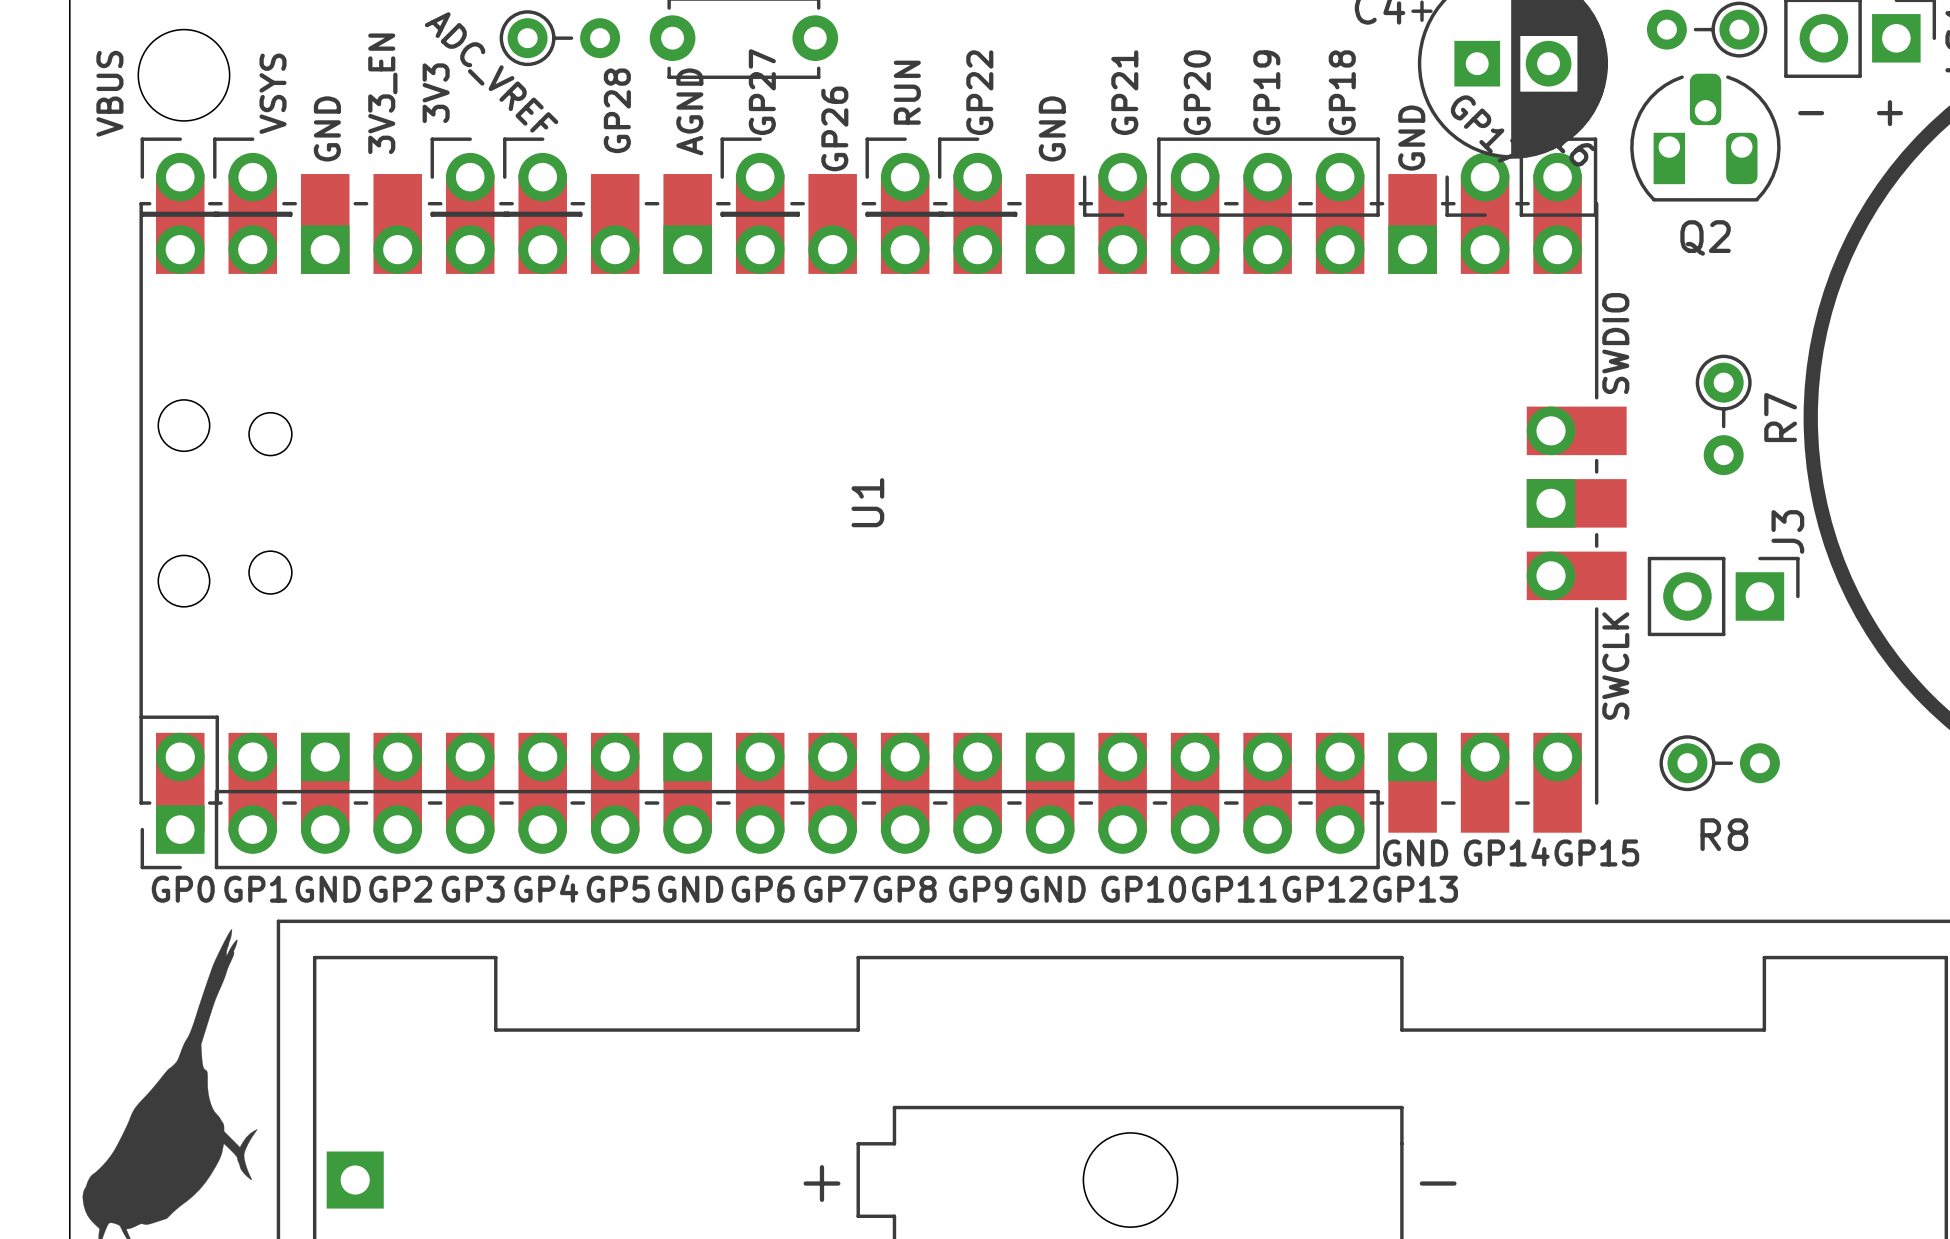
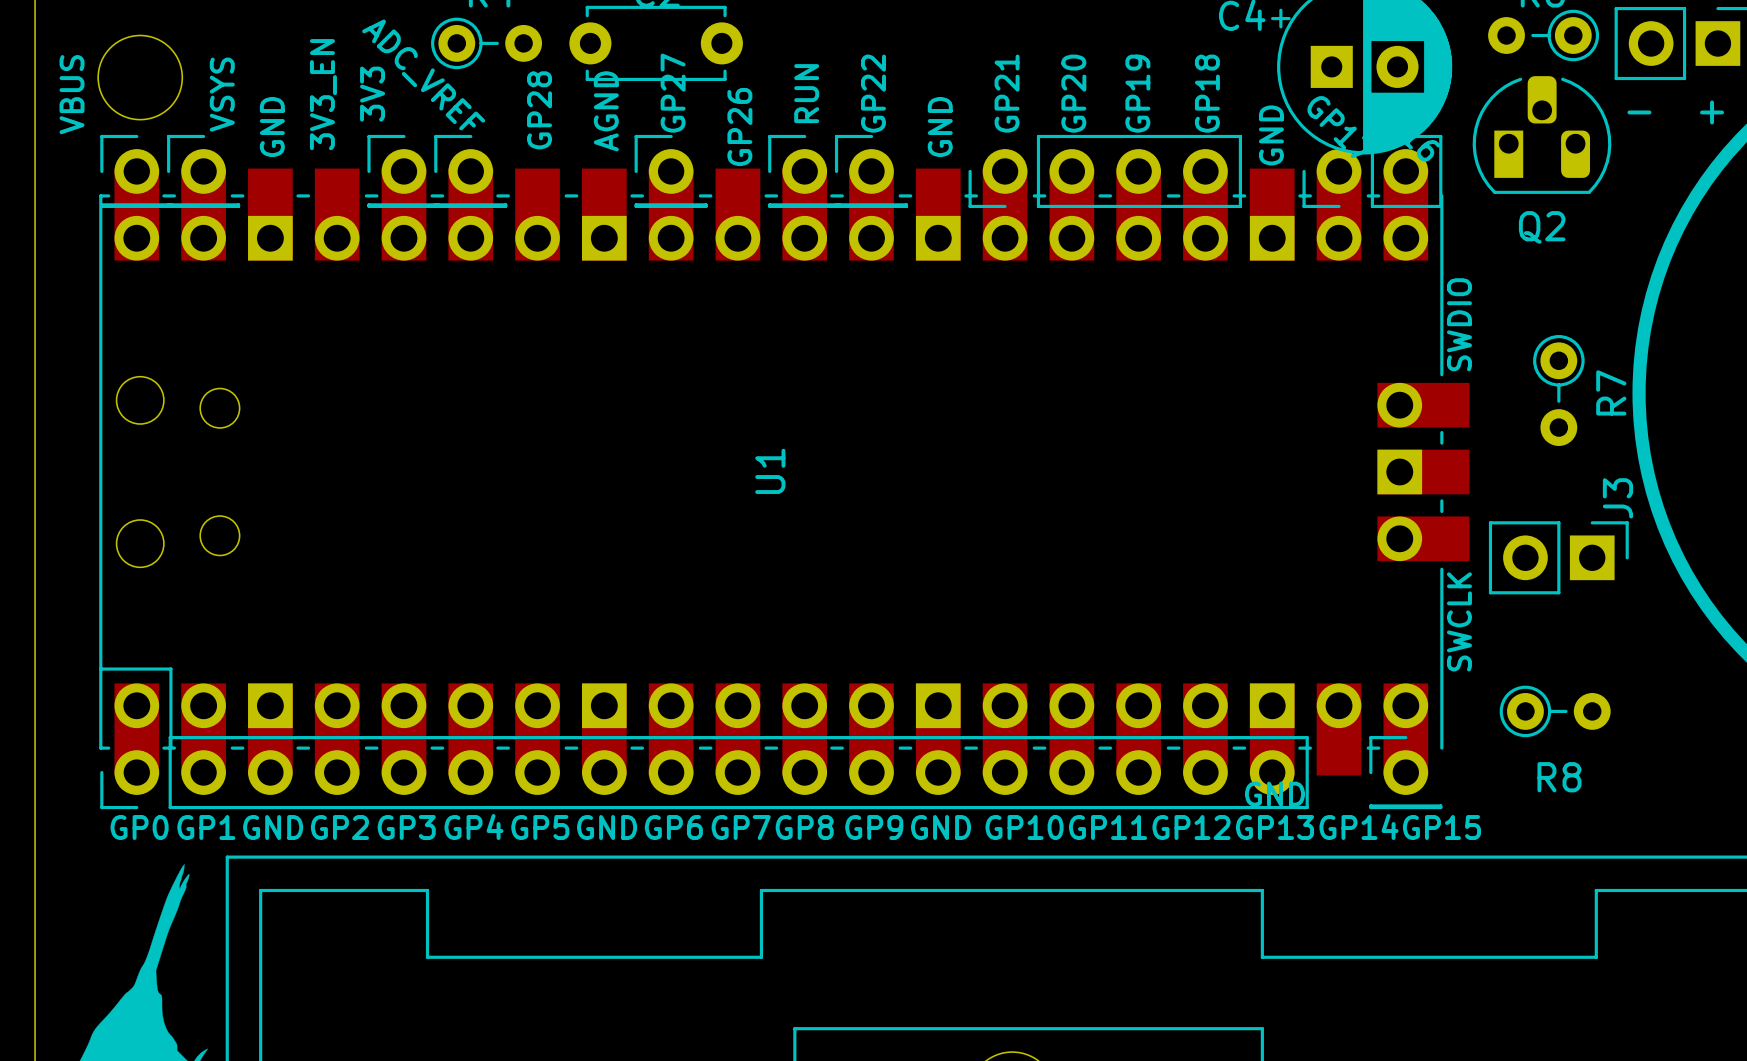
part: (760, 829) -> none
part: none -> (704, 772)
part: none -> (1405, 772)
U1 text position: GP14 (1506, 852) -> GP14 (1358, 827)
U1 text position: GP15 (1596, 852) -> GP15 (1441, 827)

